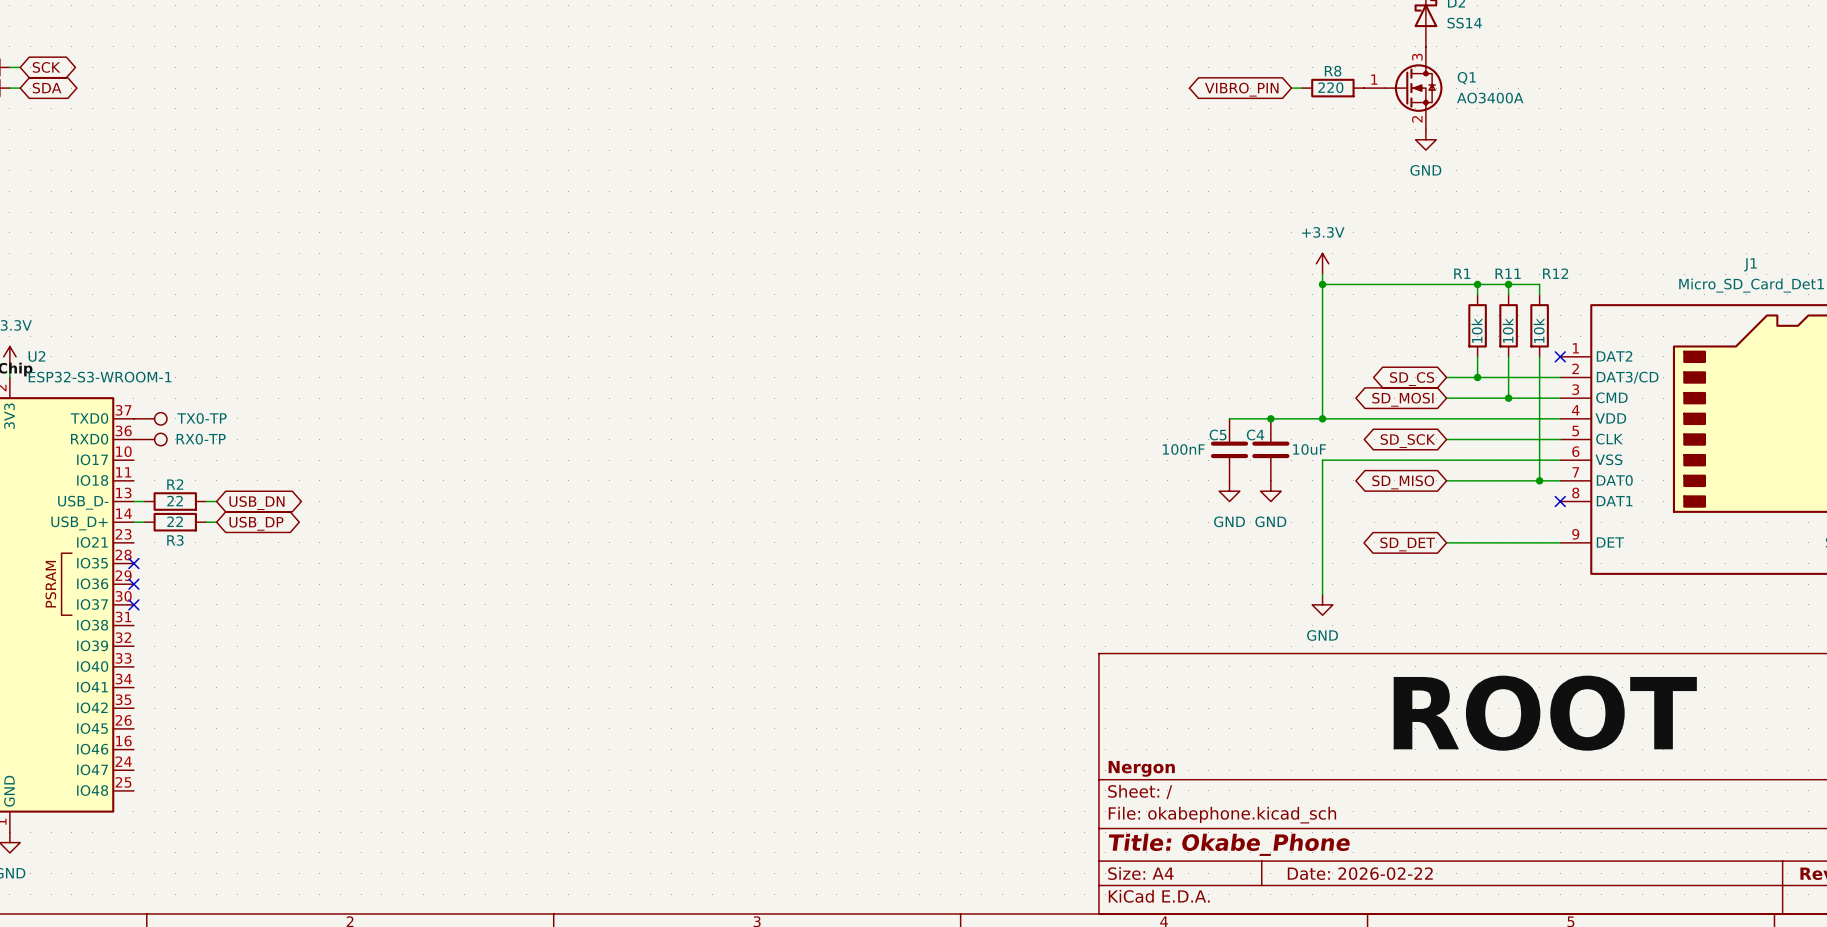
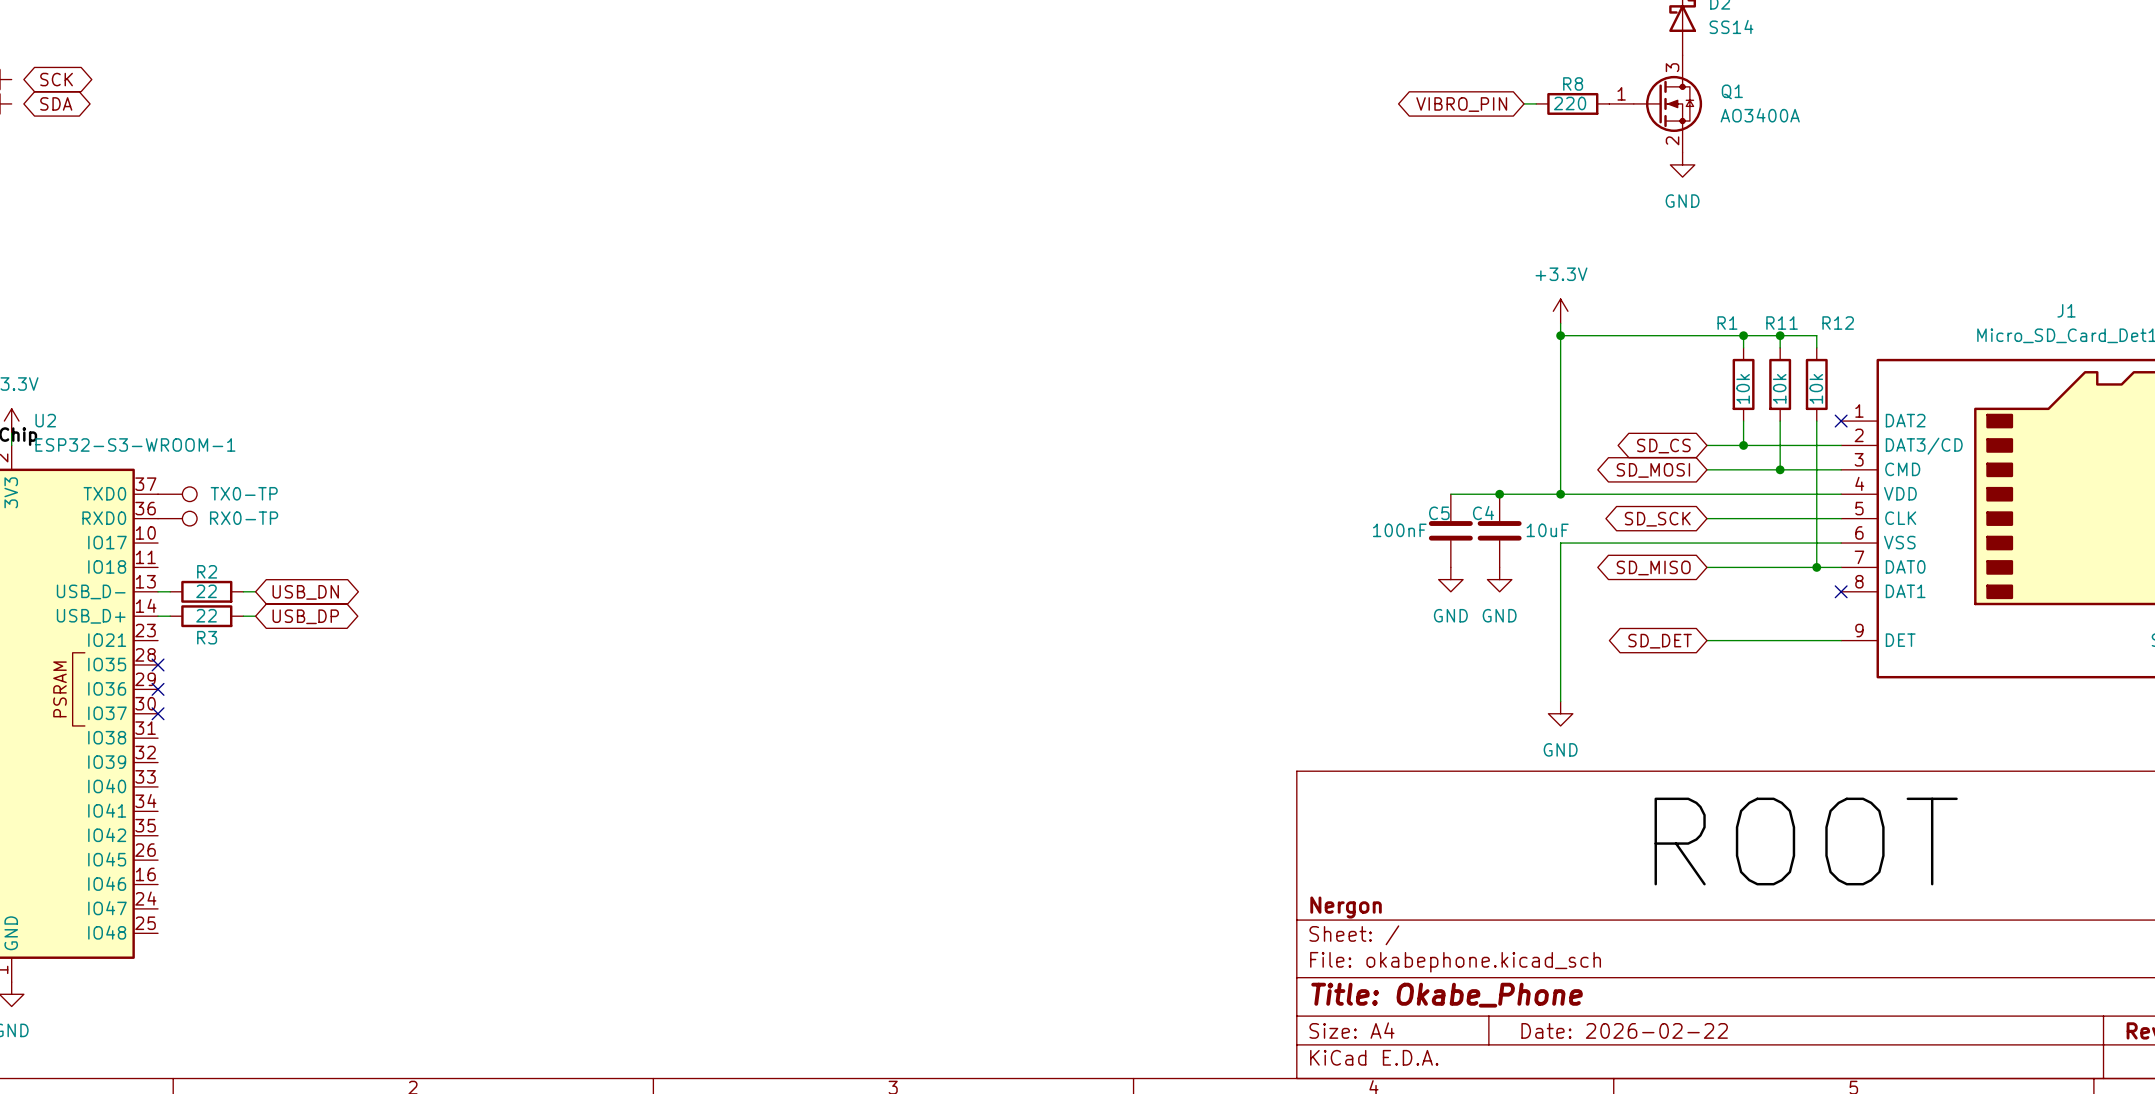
wire: (9, 67) (20, 67) -> none
wire: (9, 88) (20, 88) -> none

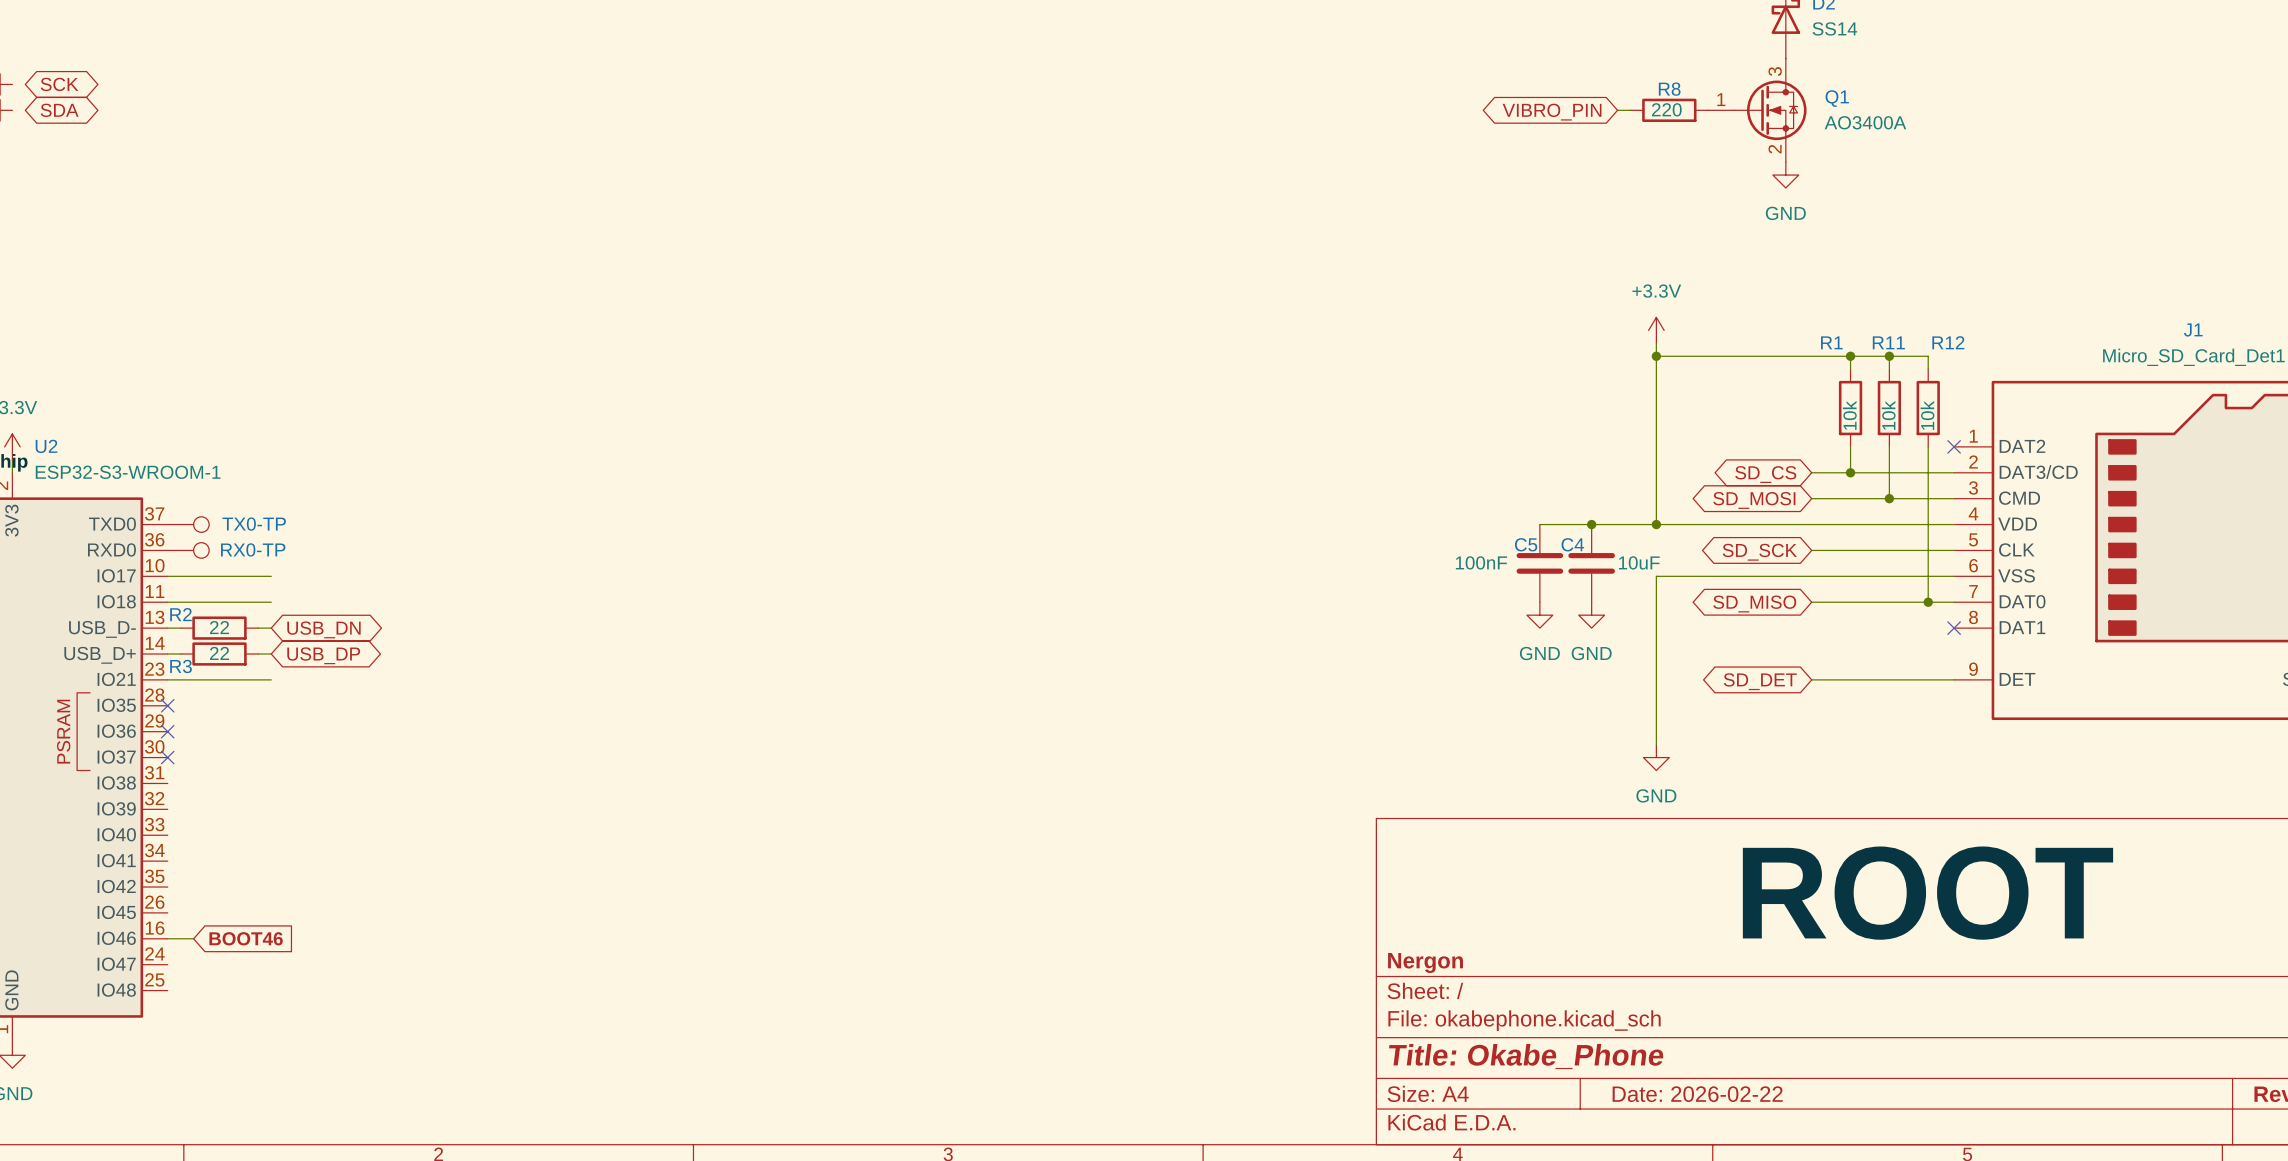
wire: none -> (167, 576) (271, 576)
wire: none -> (167, 602) (271, 602)
R2 name position: R2 (207, 571) -> R2 (180, 614)
R3 name position: R3 (207, 637) -> R3 (181, 666)
wire: none -> (167, 679) (271, 679)
wire: none -> (167, 938) (193, 938)
global label: none -> BOOT46 (246, 938)

